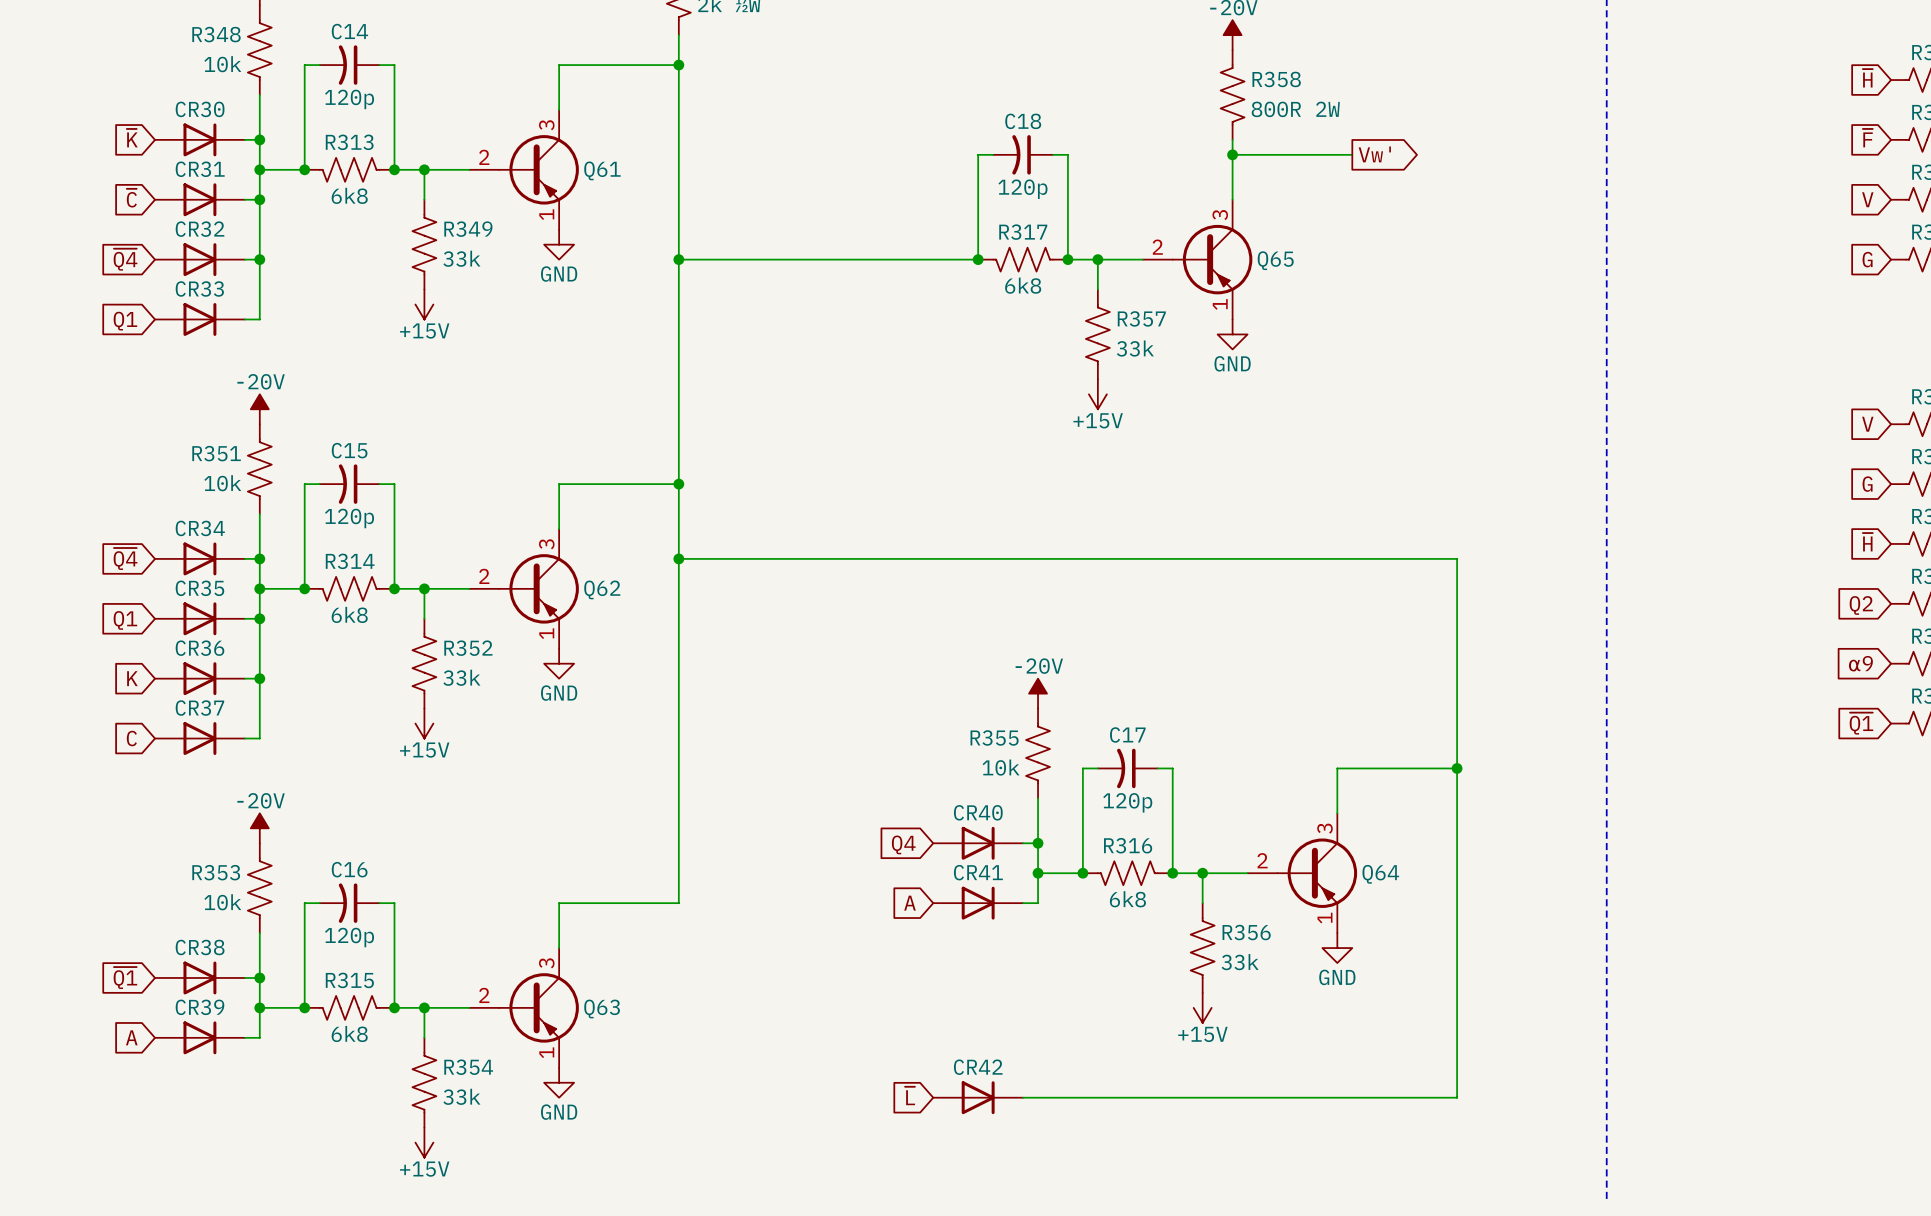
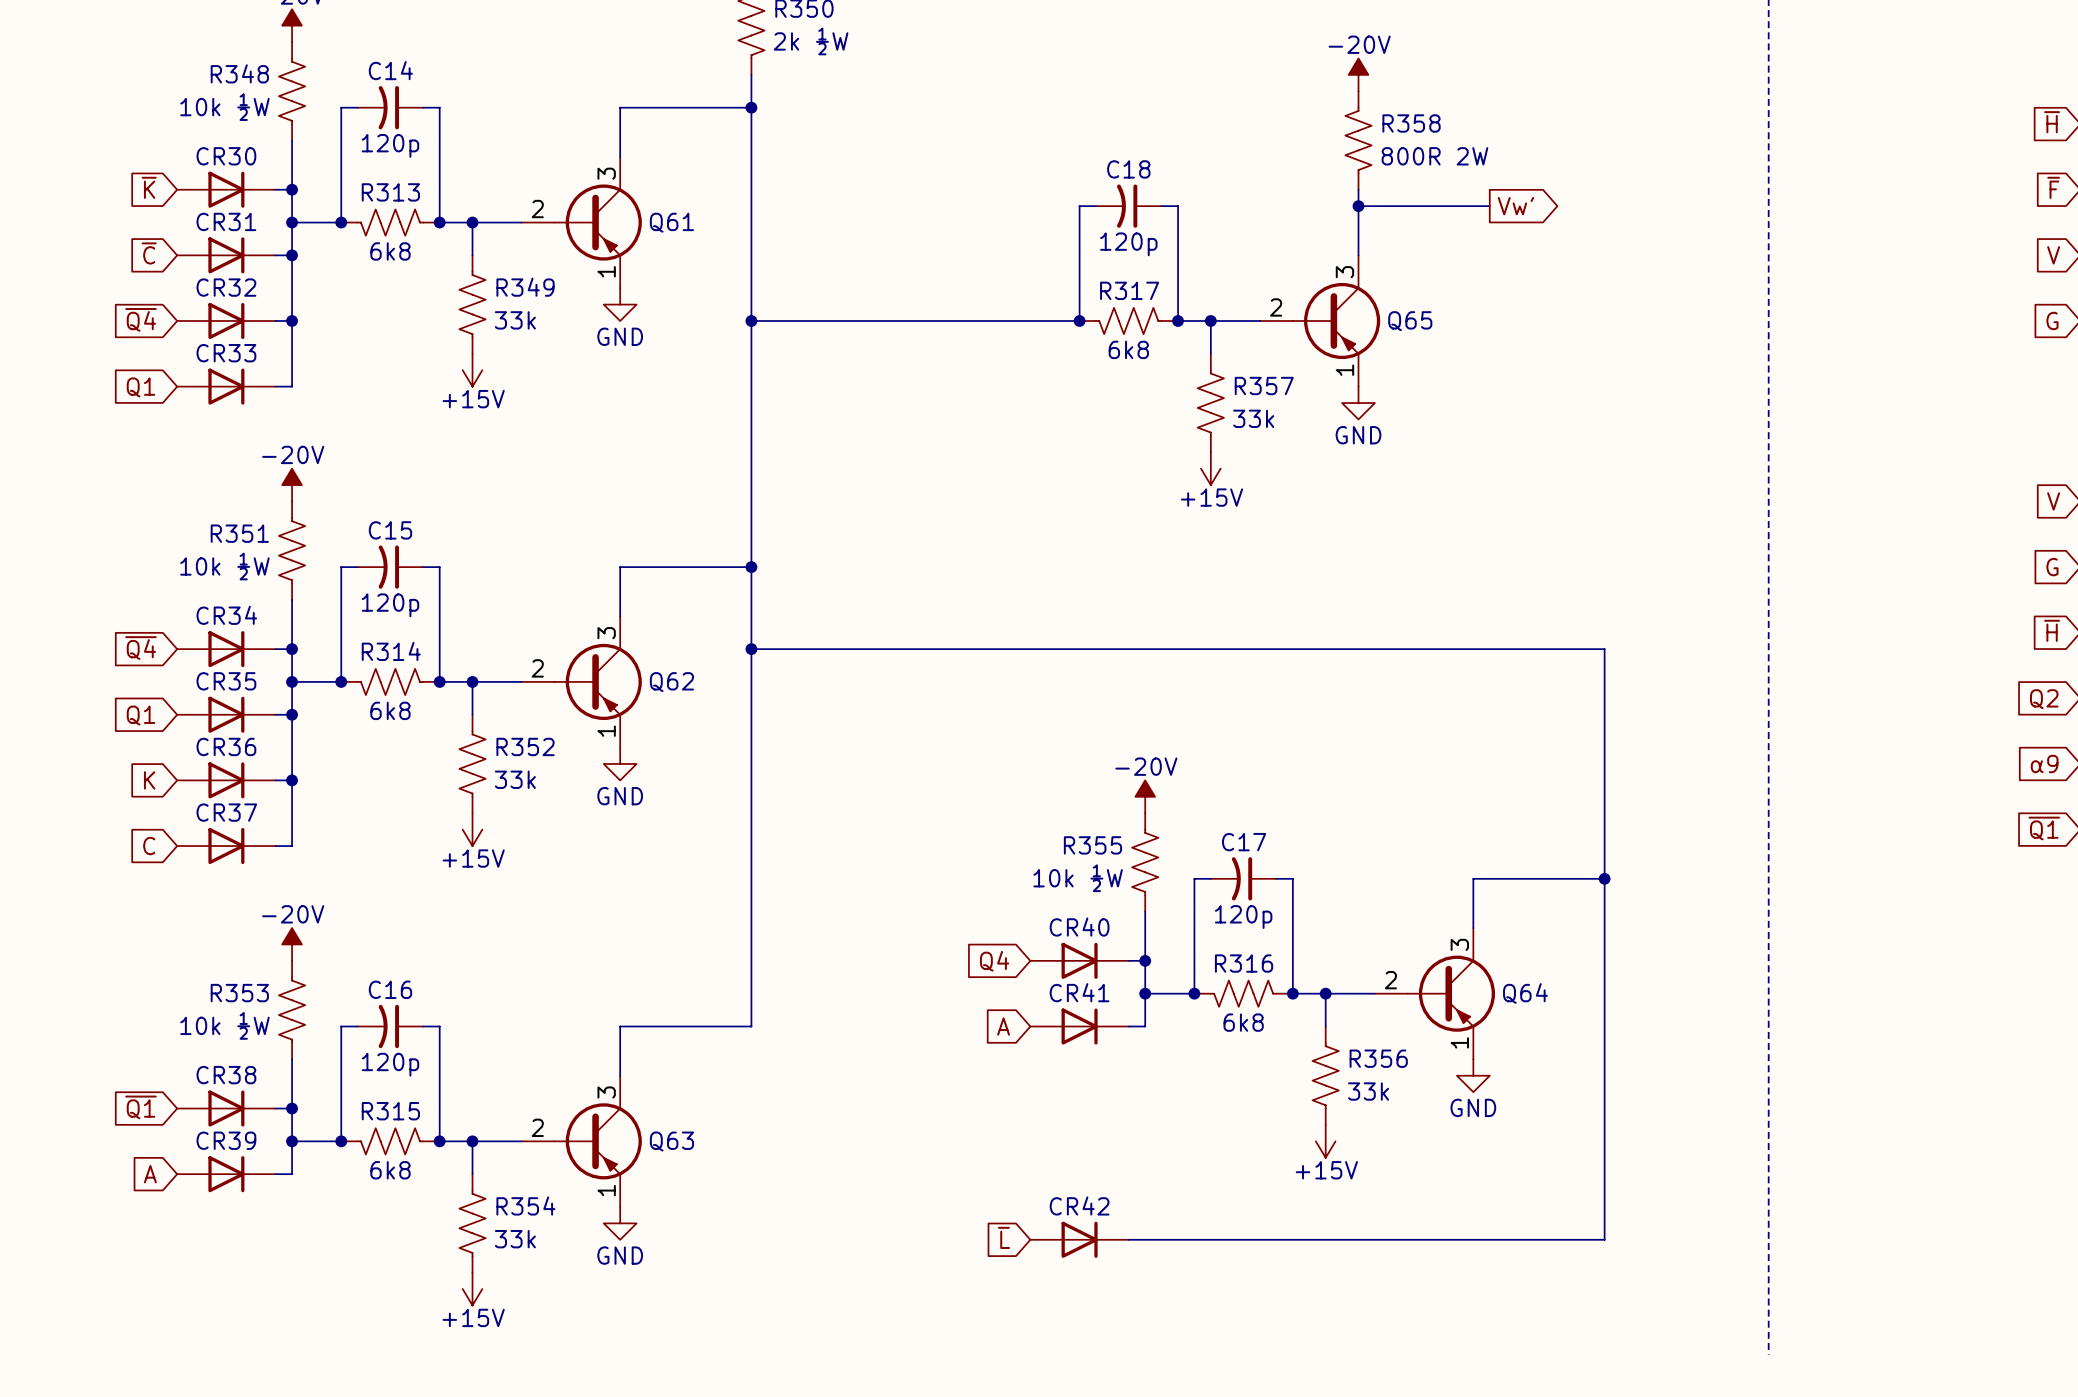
R348 value: 10k (222, 64) -> 10k ½W (224, 107)
R351 value: 10k (222, 483) -> 10k ½W (224, 566)
R355 value: 10k (1001, 767) -> 10k ½W (1078, 878)
R353 value: 10k (222, 902) -> 10k ½W (224, 1025)

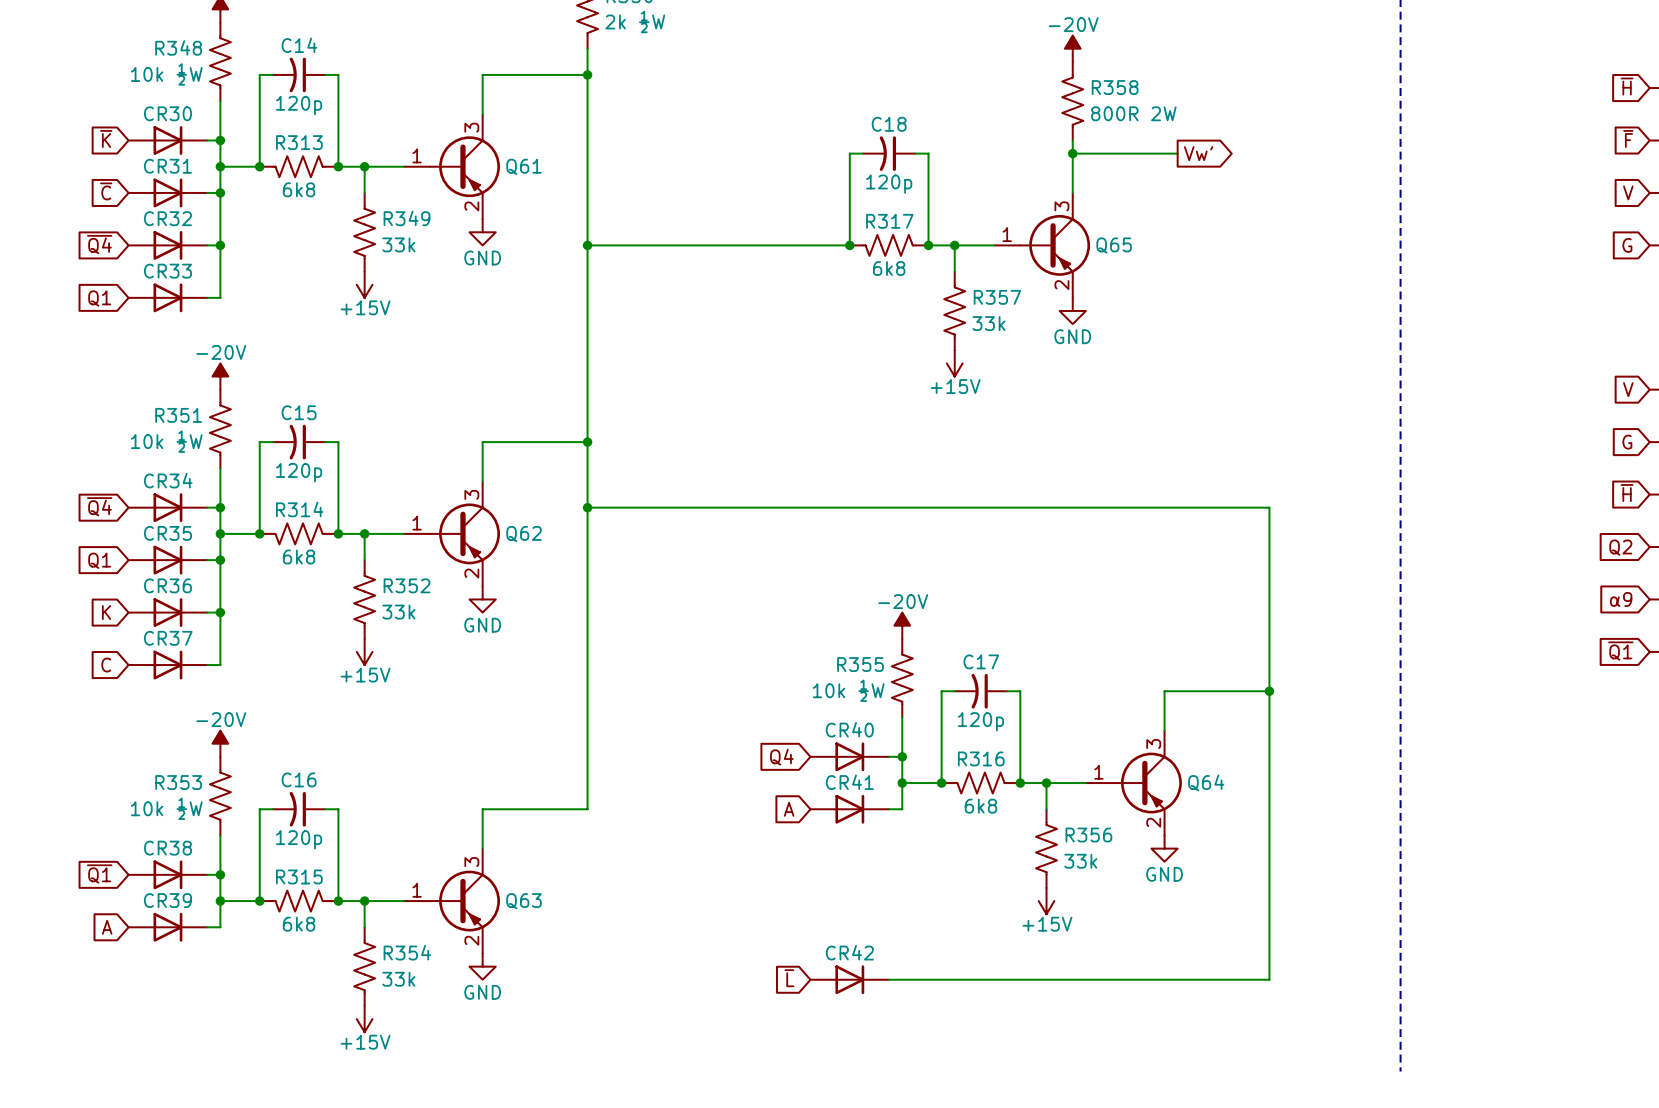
Q61 pin number: 2 (537, 209) -> 1 (417, 155)
Q61 pin number: 1 (606, 271) -> 2 (471, 206)
Q65 pin number: 2 (1276, 307) -> 1 (1007, 234)
Q65 pin number: 1 (1344, 370) -> 2 (1061, 285)
Q62 pin number: 2 (537, 668) -> 1 (417, 523)
Q62 pin number: 1 (606, 731) -> 2 (471, 573)
Q64 pin number: 2 (1390, 980) -> 1 (1098, 772)
Q64 pin number: 1 (1459, 1042) -> 2 (1153, 822)
Q63 pin number: 2 (537, 1127) -> 1 (417, 890)
Q63 pin number: 1 (606, 1190) -> 2 (471, 940)

